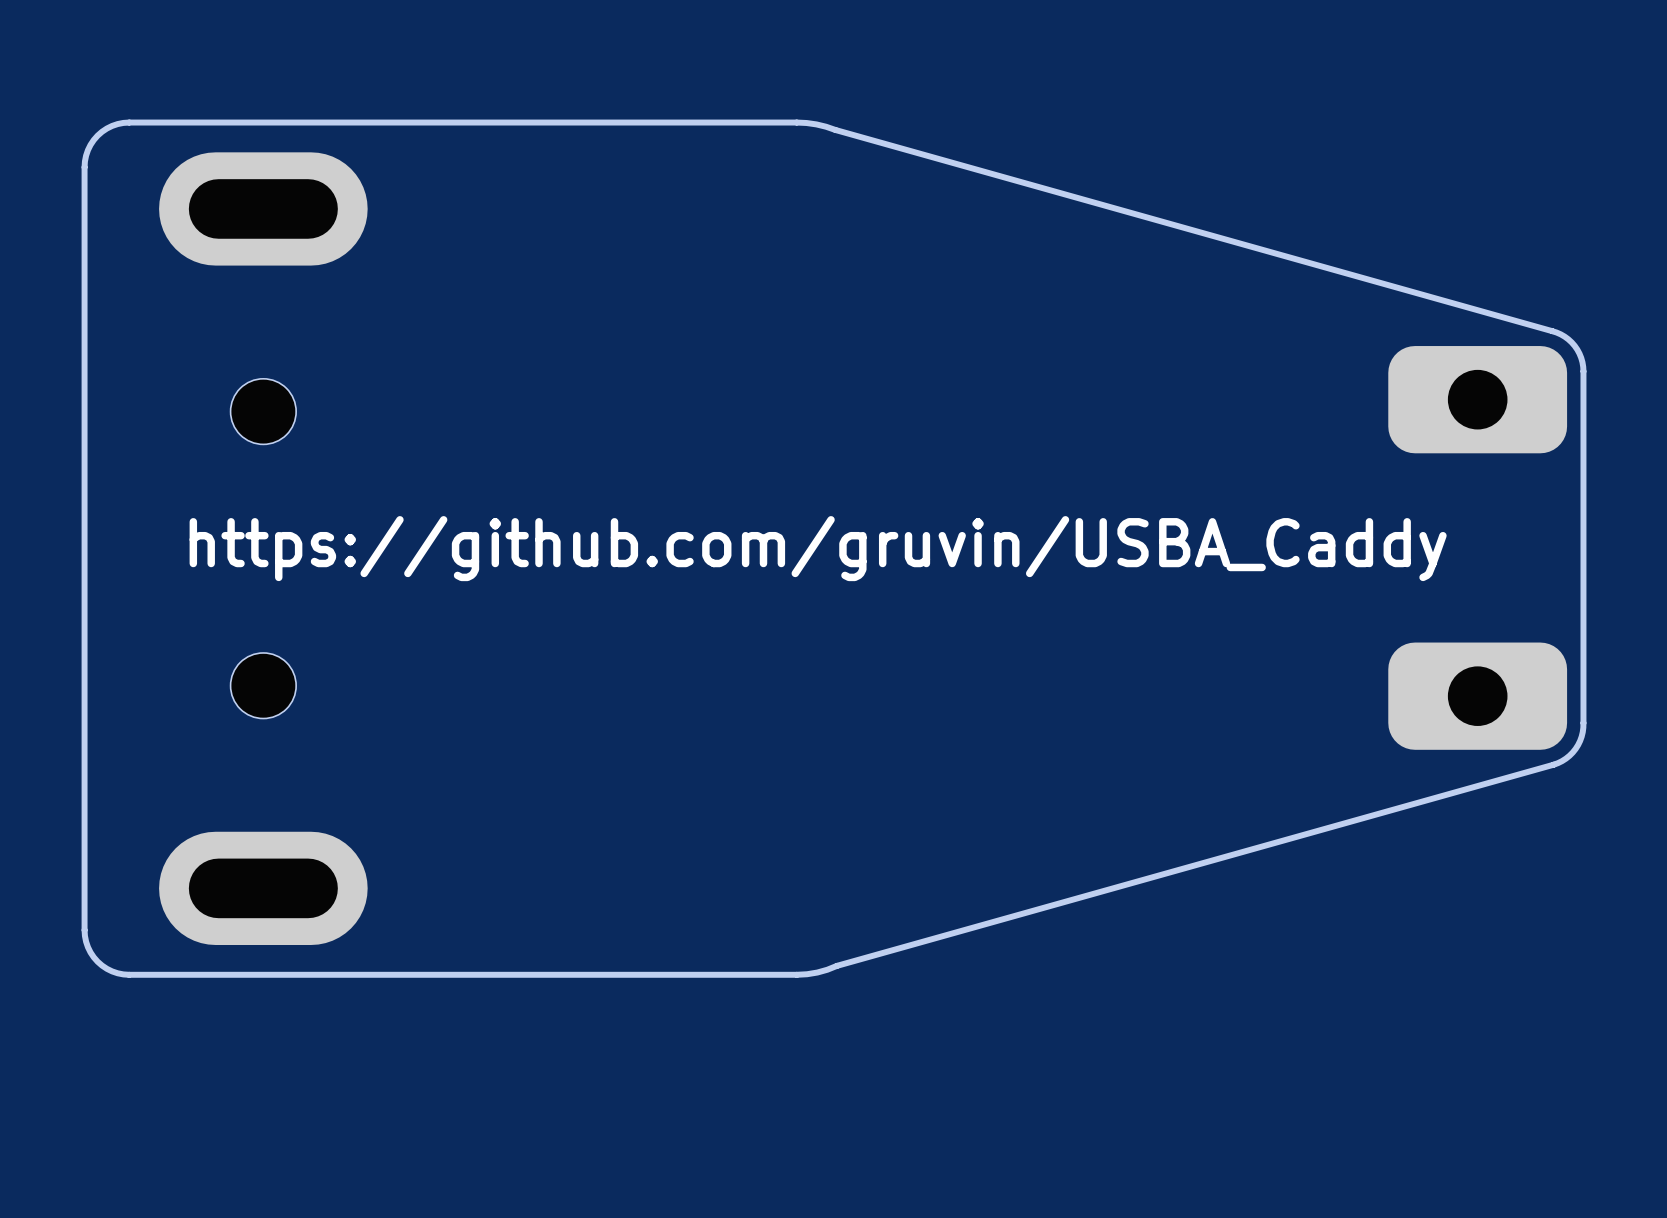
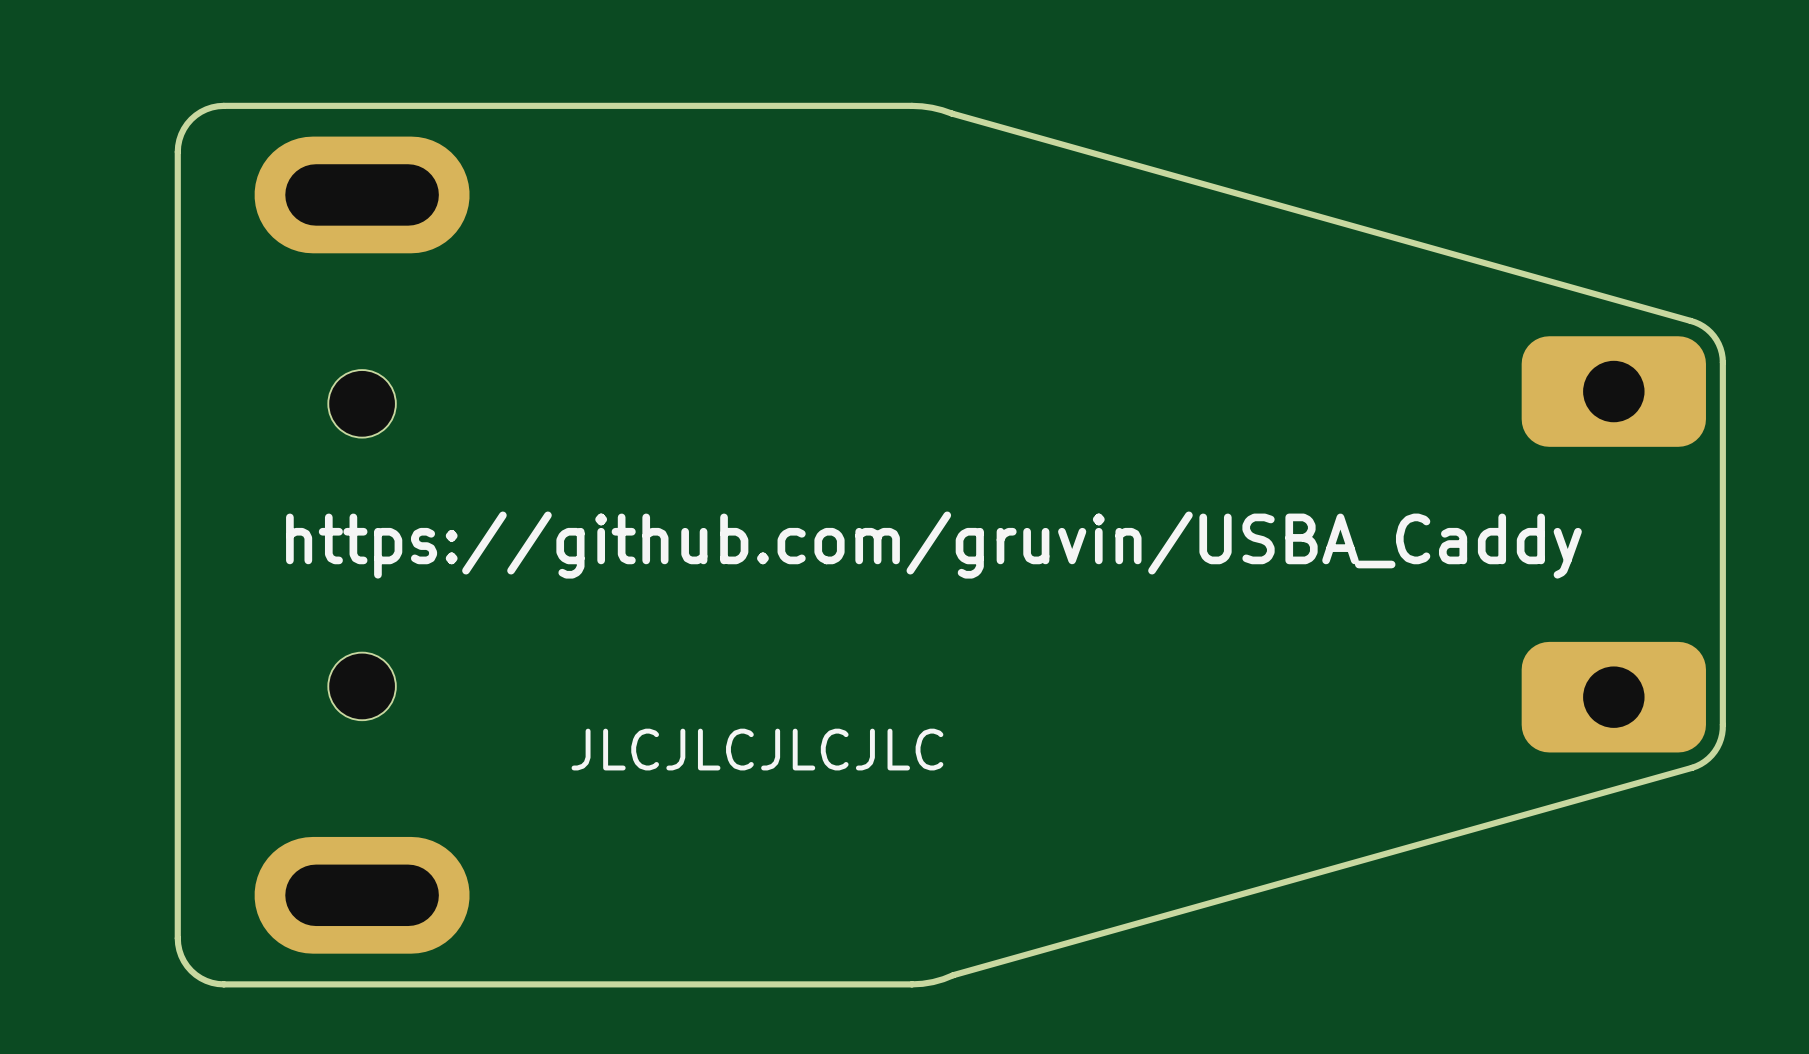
text: none -> JLCJLCJLCJLC (757, 749)

